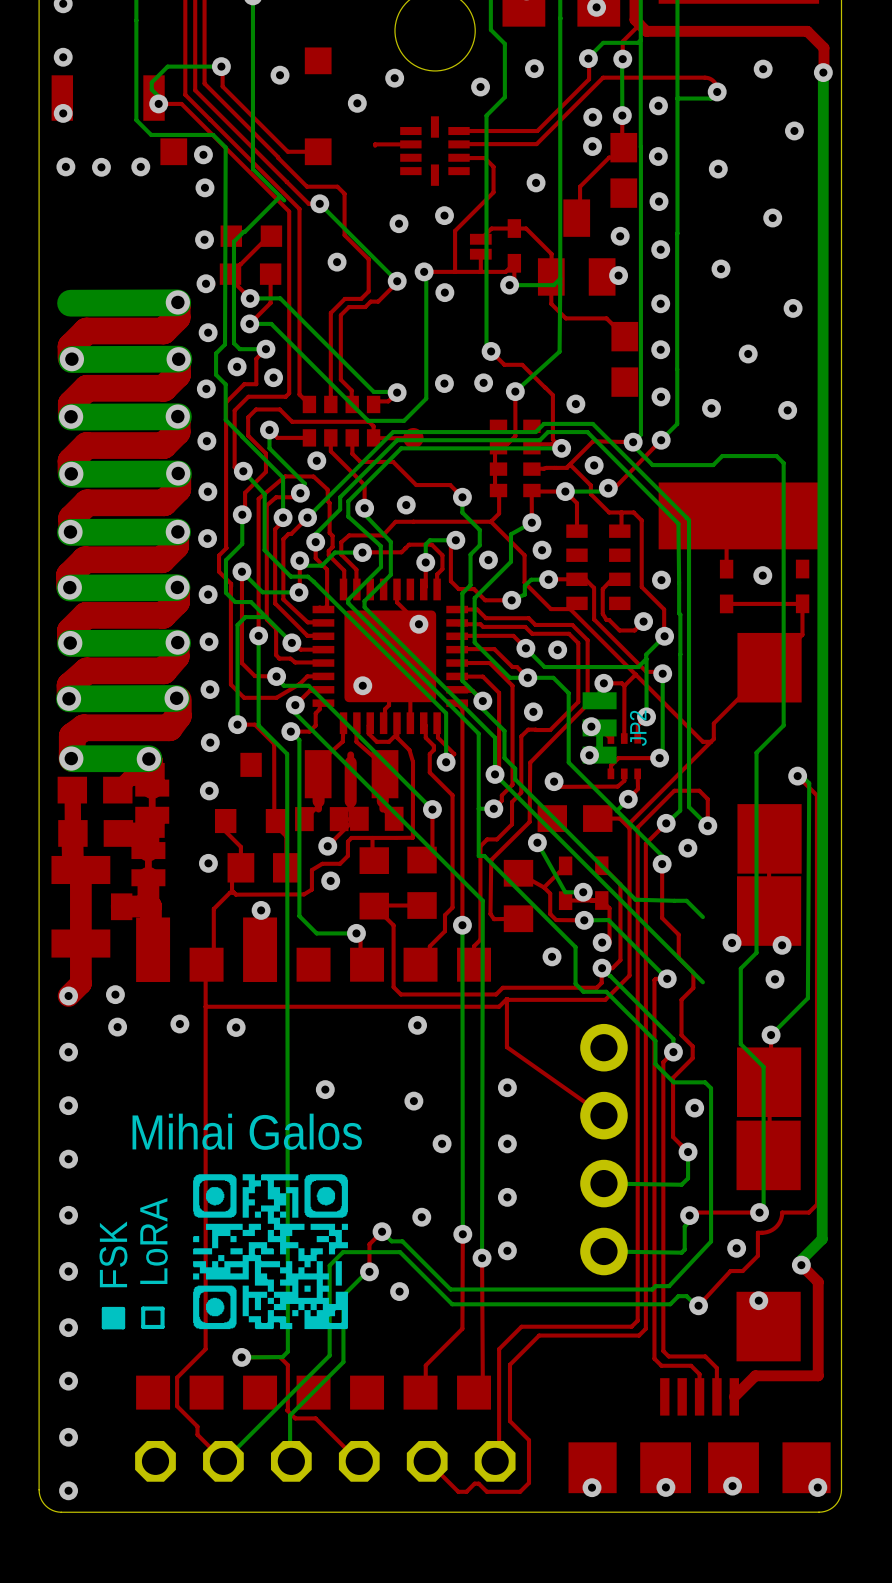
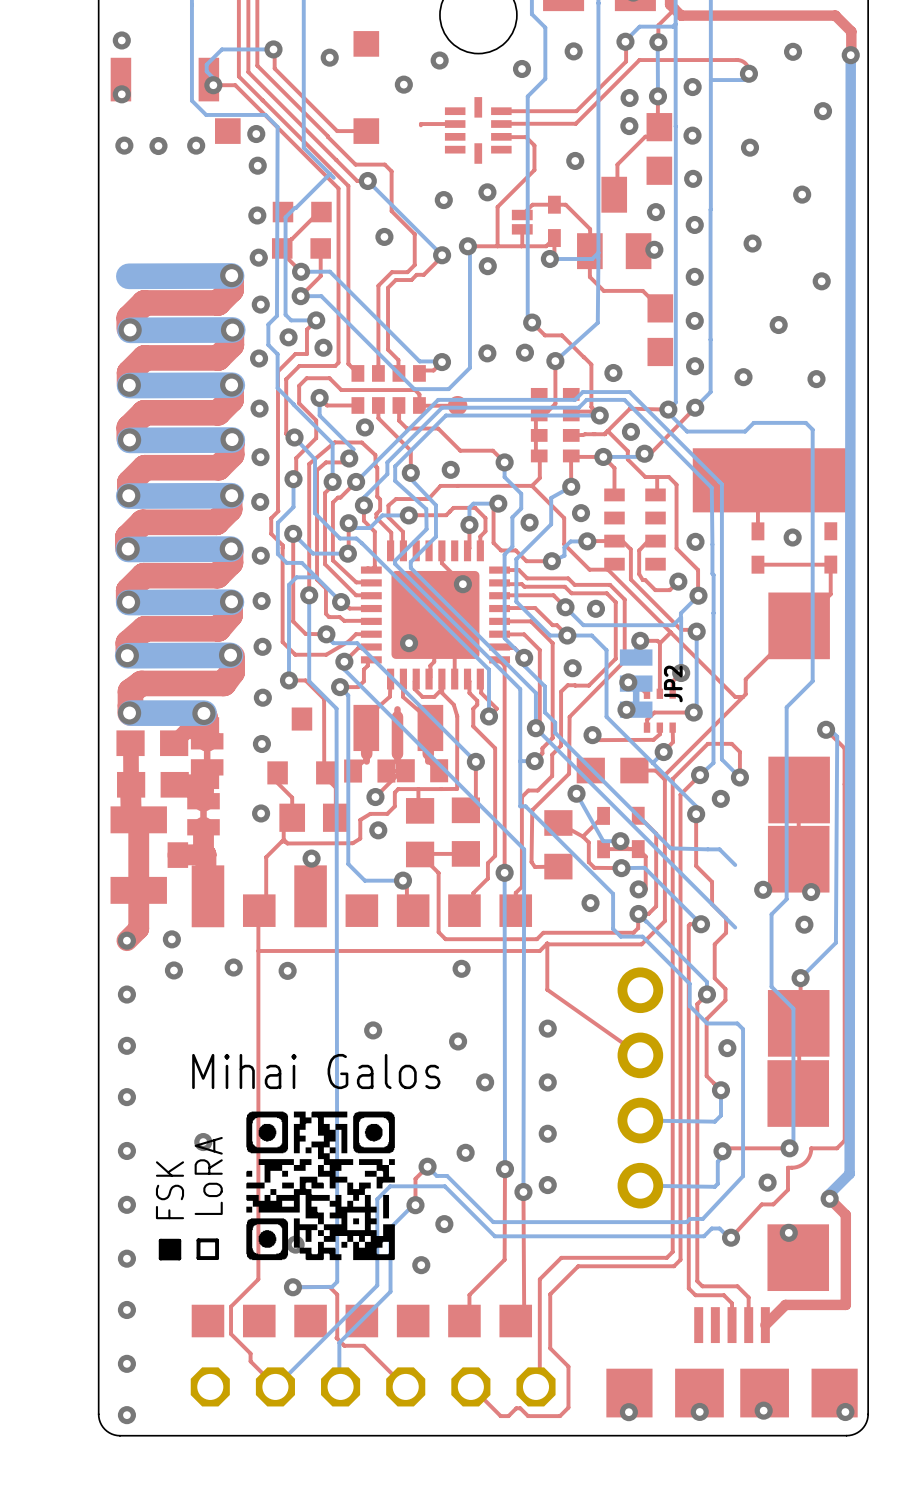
via: none -> (203, 1142)
via: none -> (295, 1244)
via: none -> (421, 1265)

